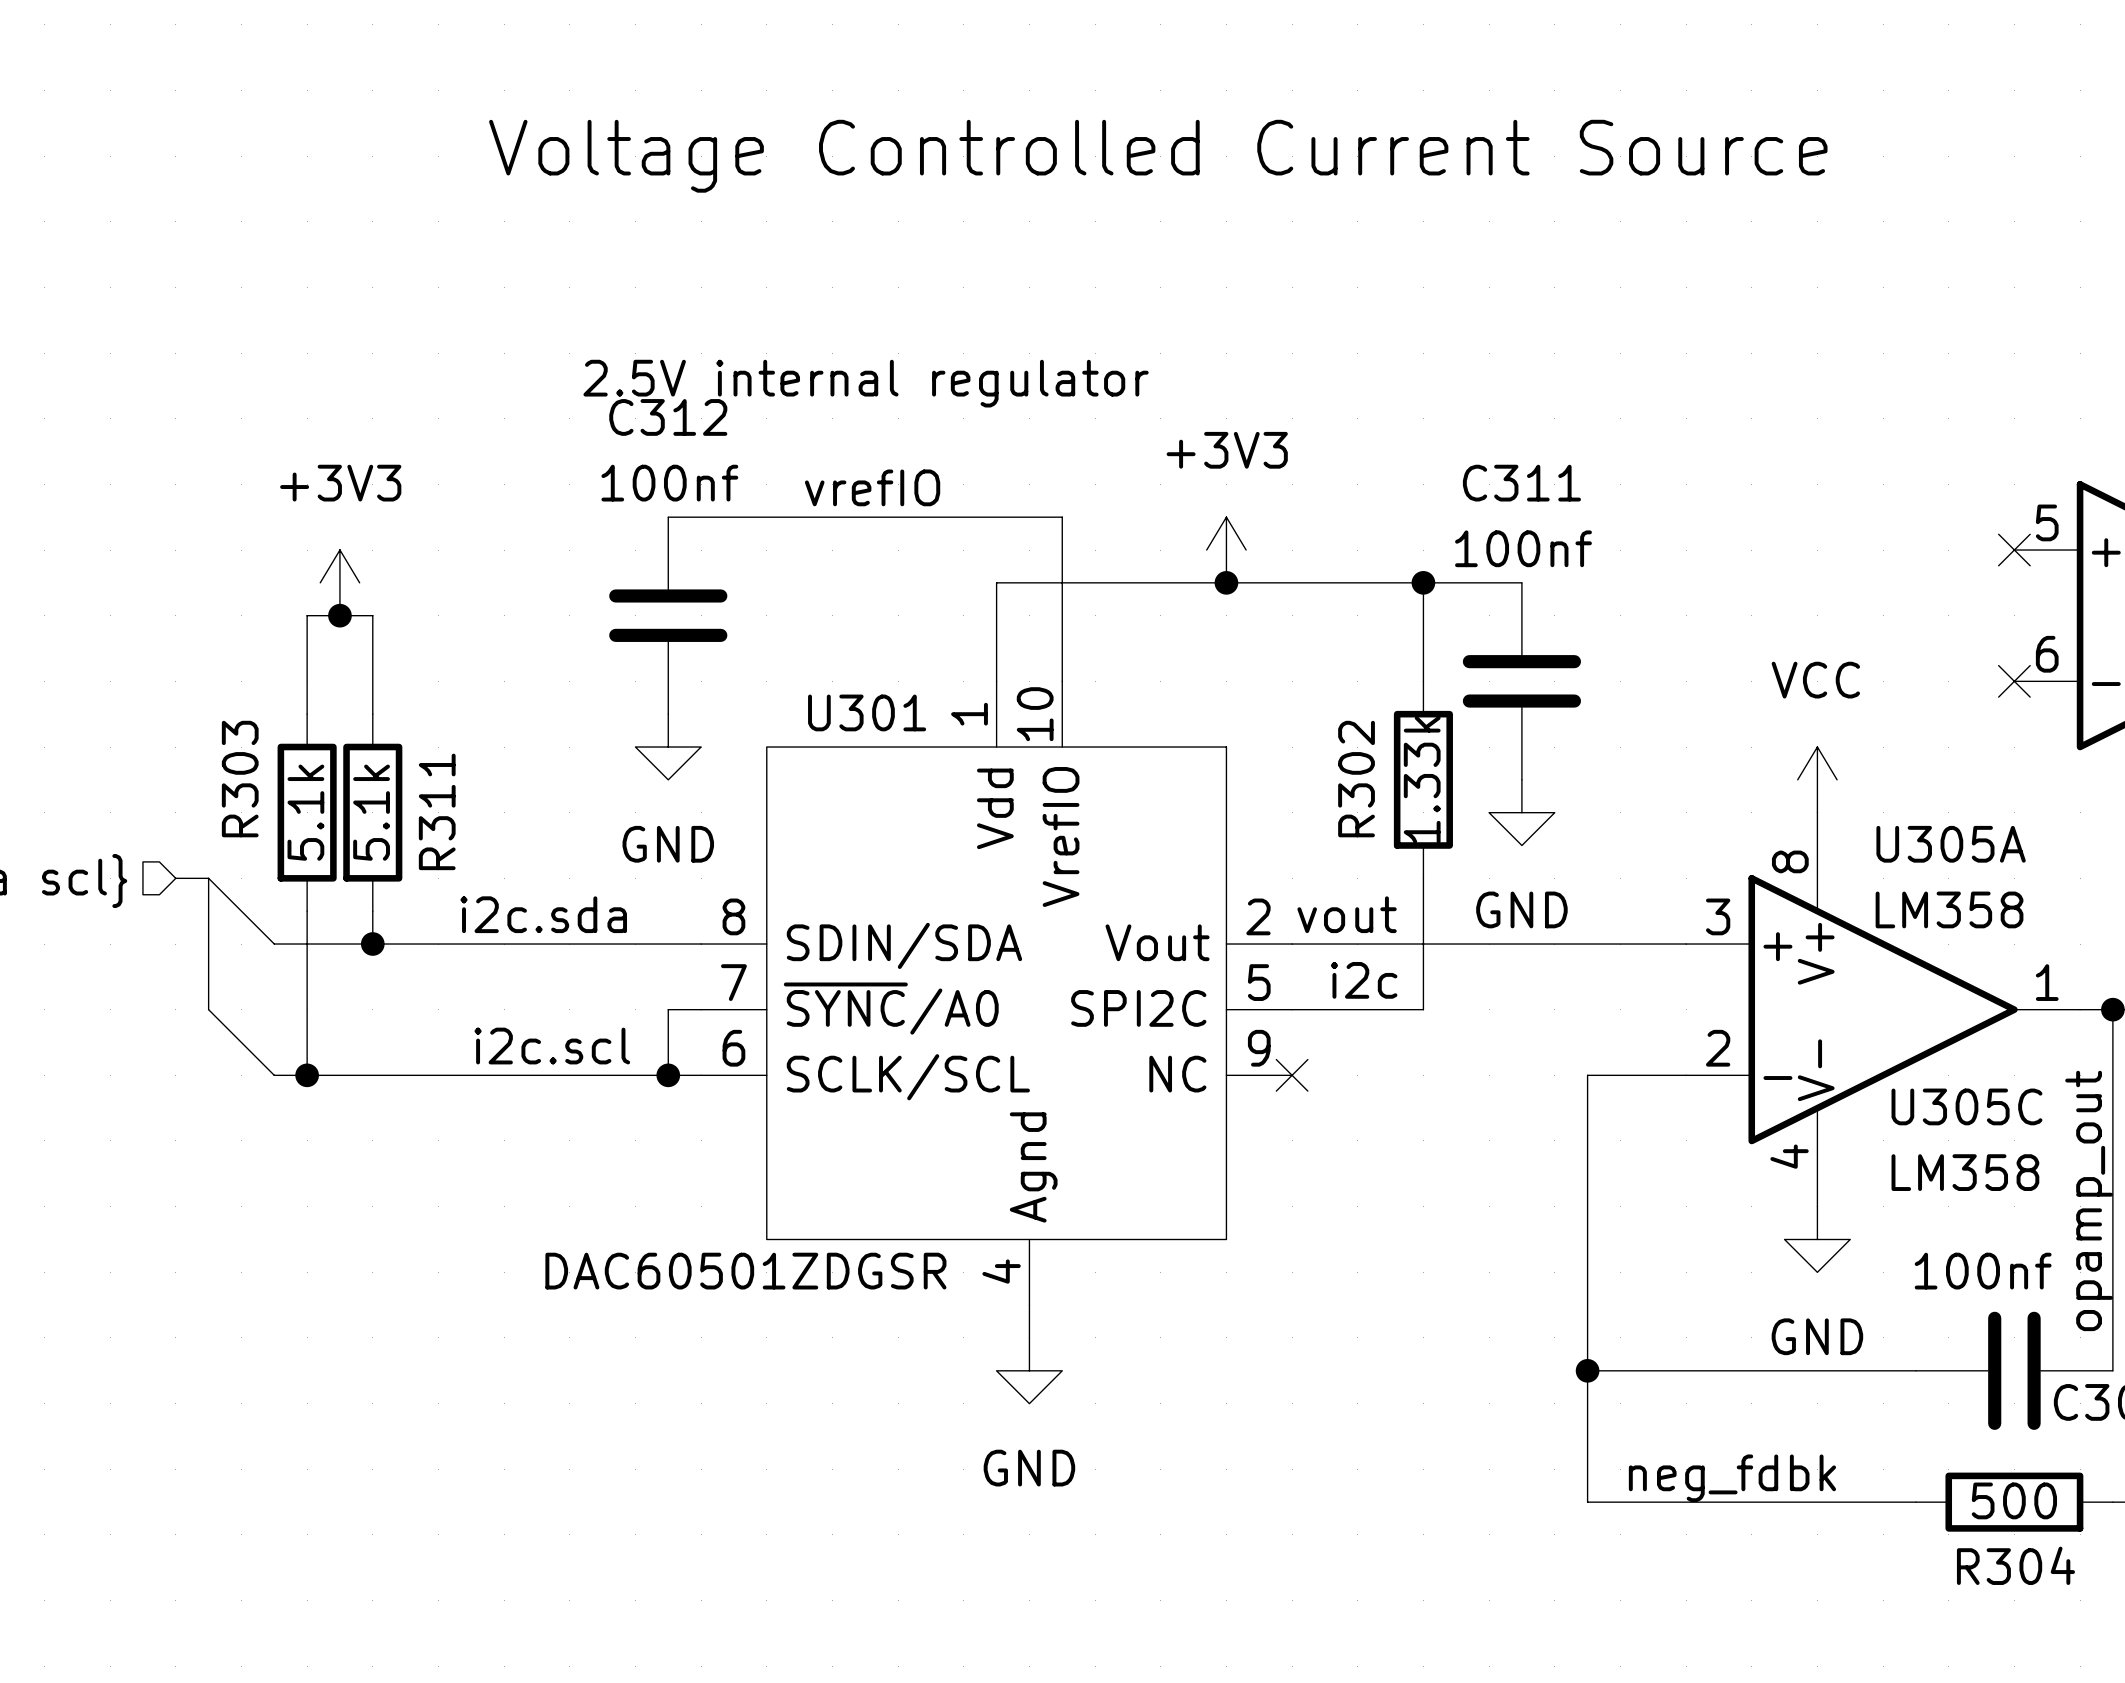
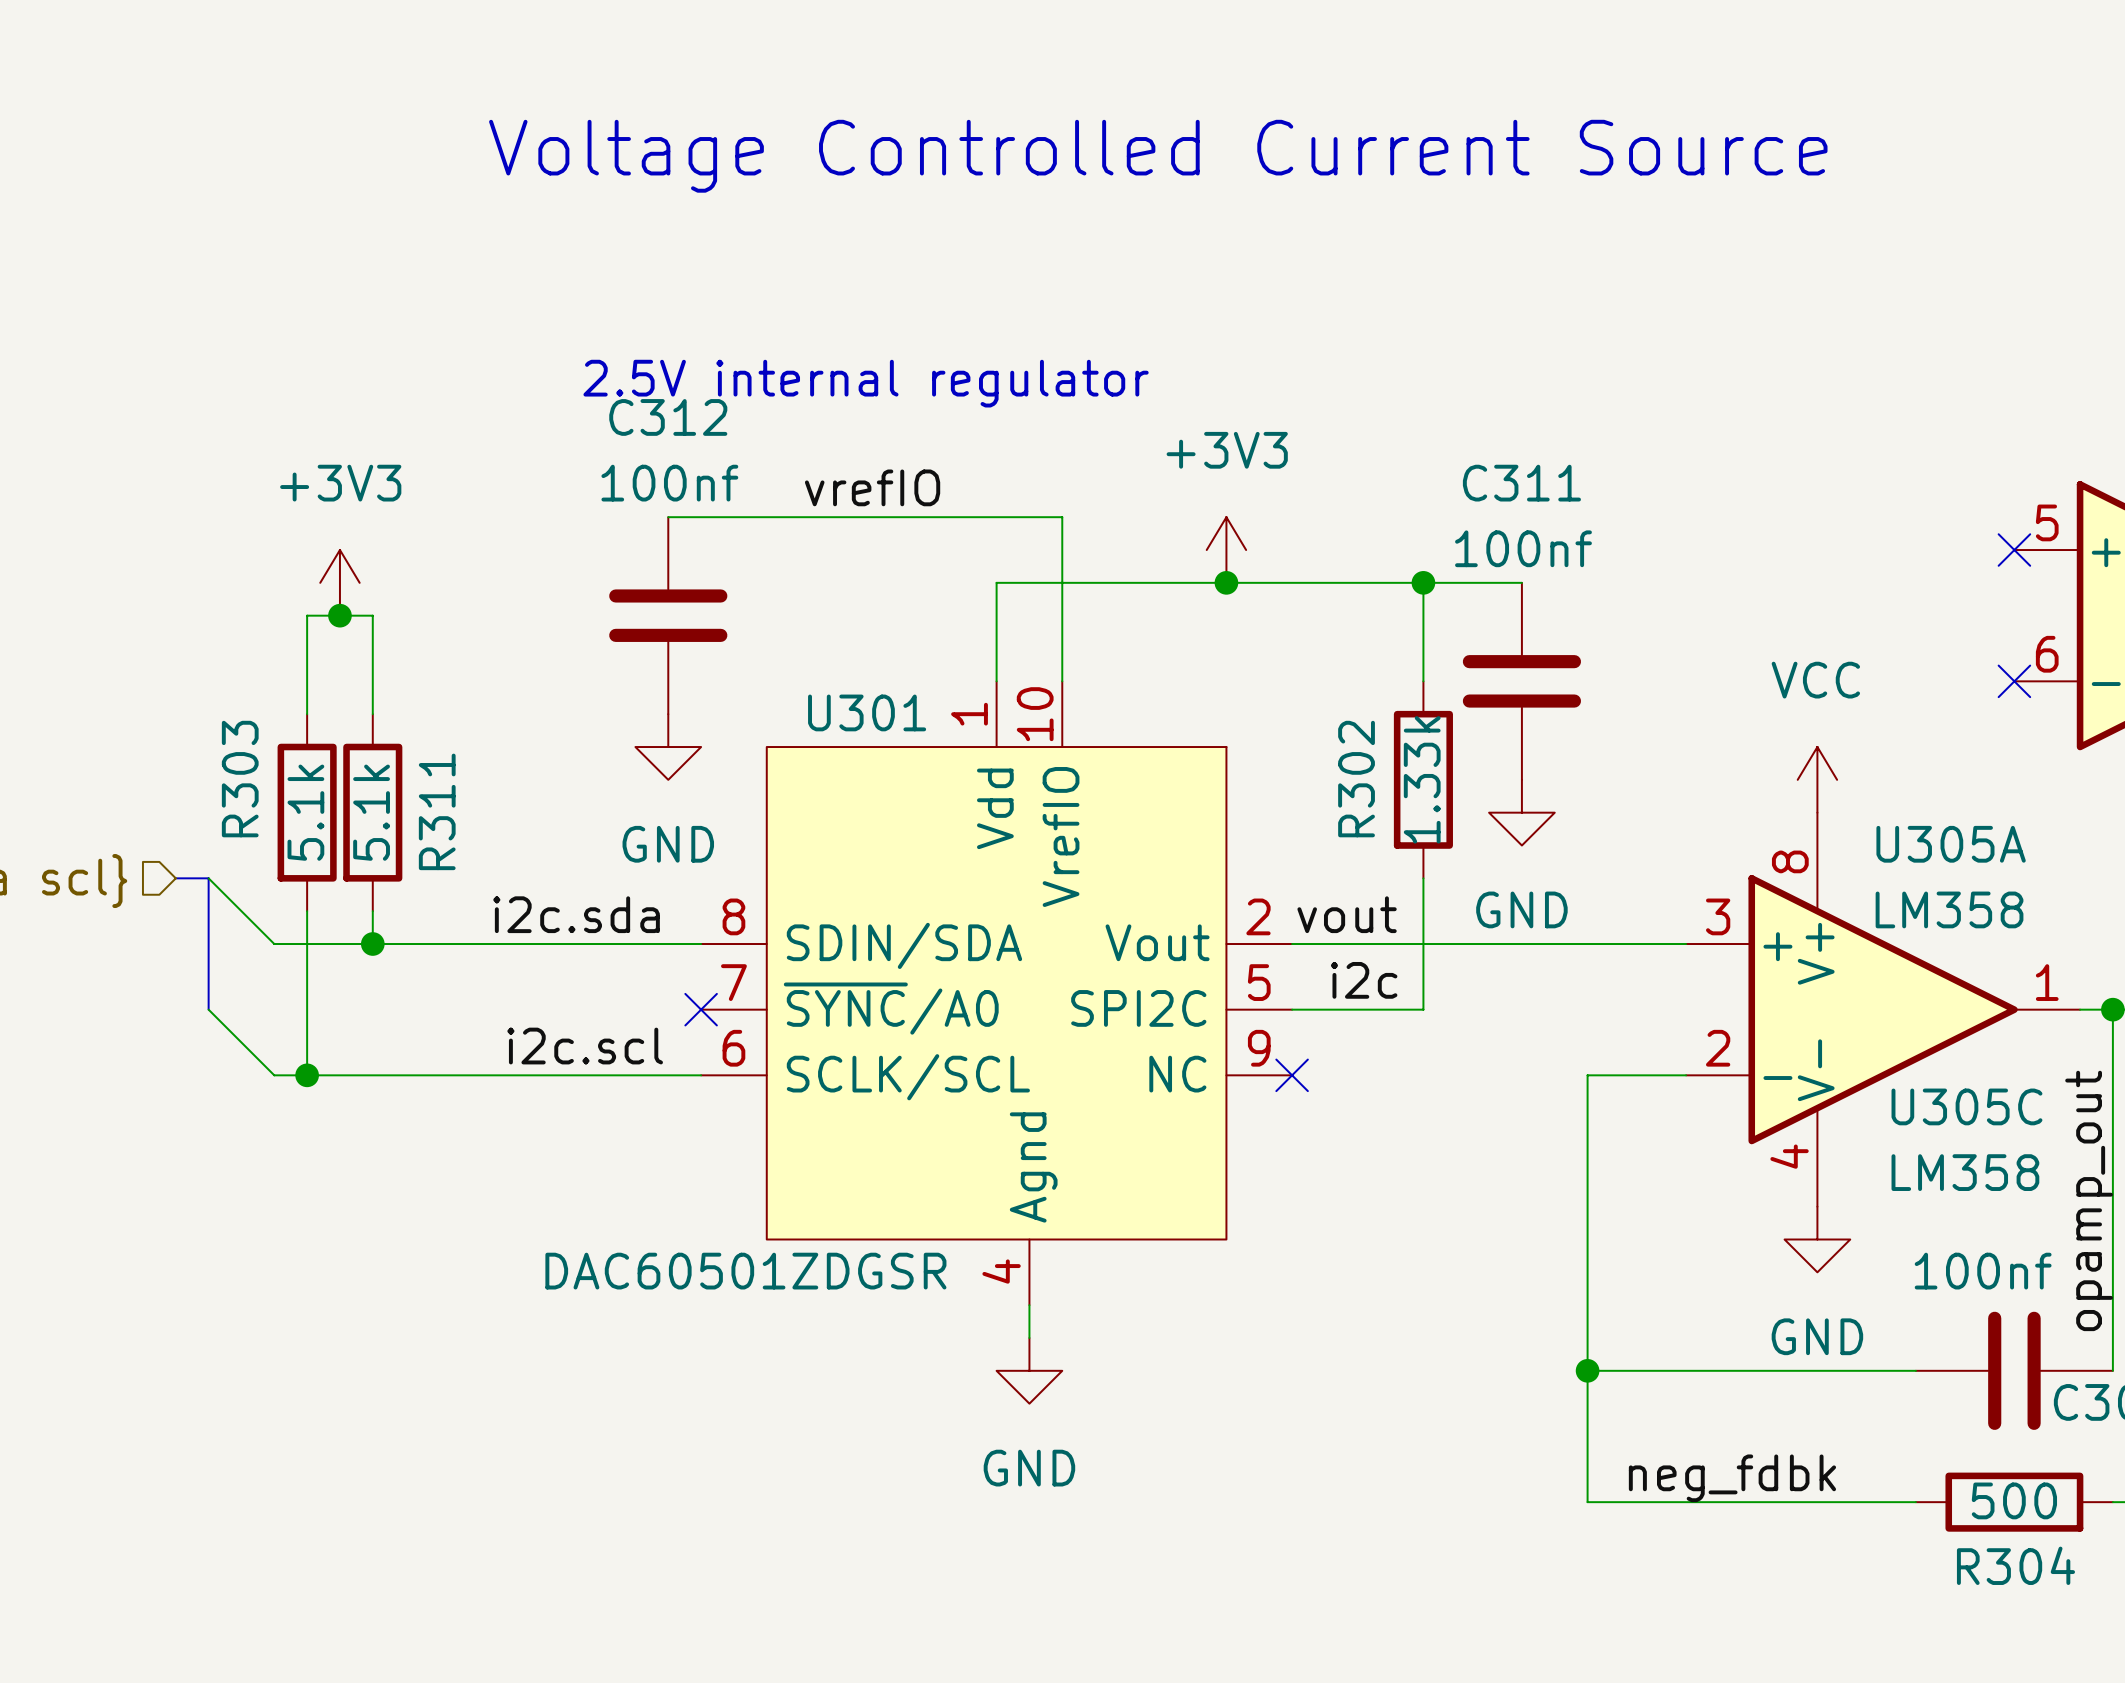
label position: i2c.sda (543, 914) -> i2c.sda (576, 914)
wire: (701, 1009) (668, 1009) (668, 1075) -> none
no-connect mark: none -> (701, 1009)
label position: i2c.scl (552, 1046) -> i2c.scl (585, 1046)
junction: (668, 1075) -> none

